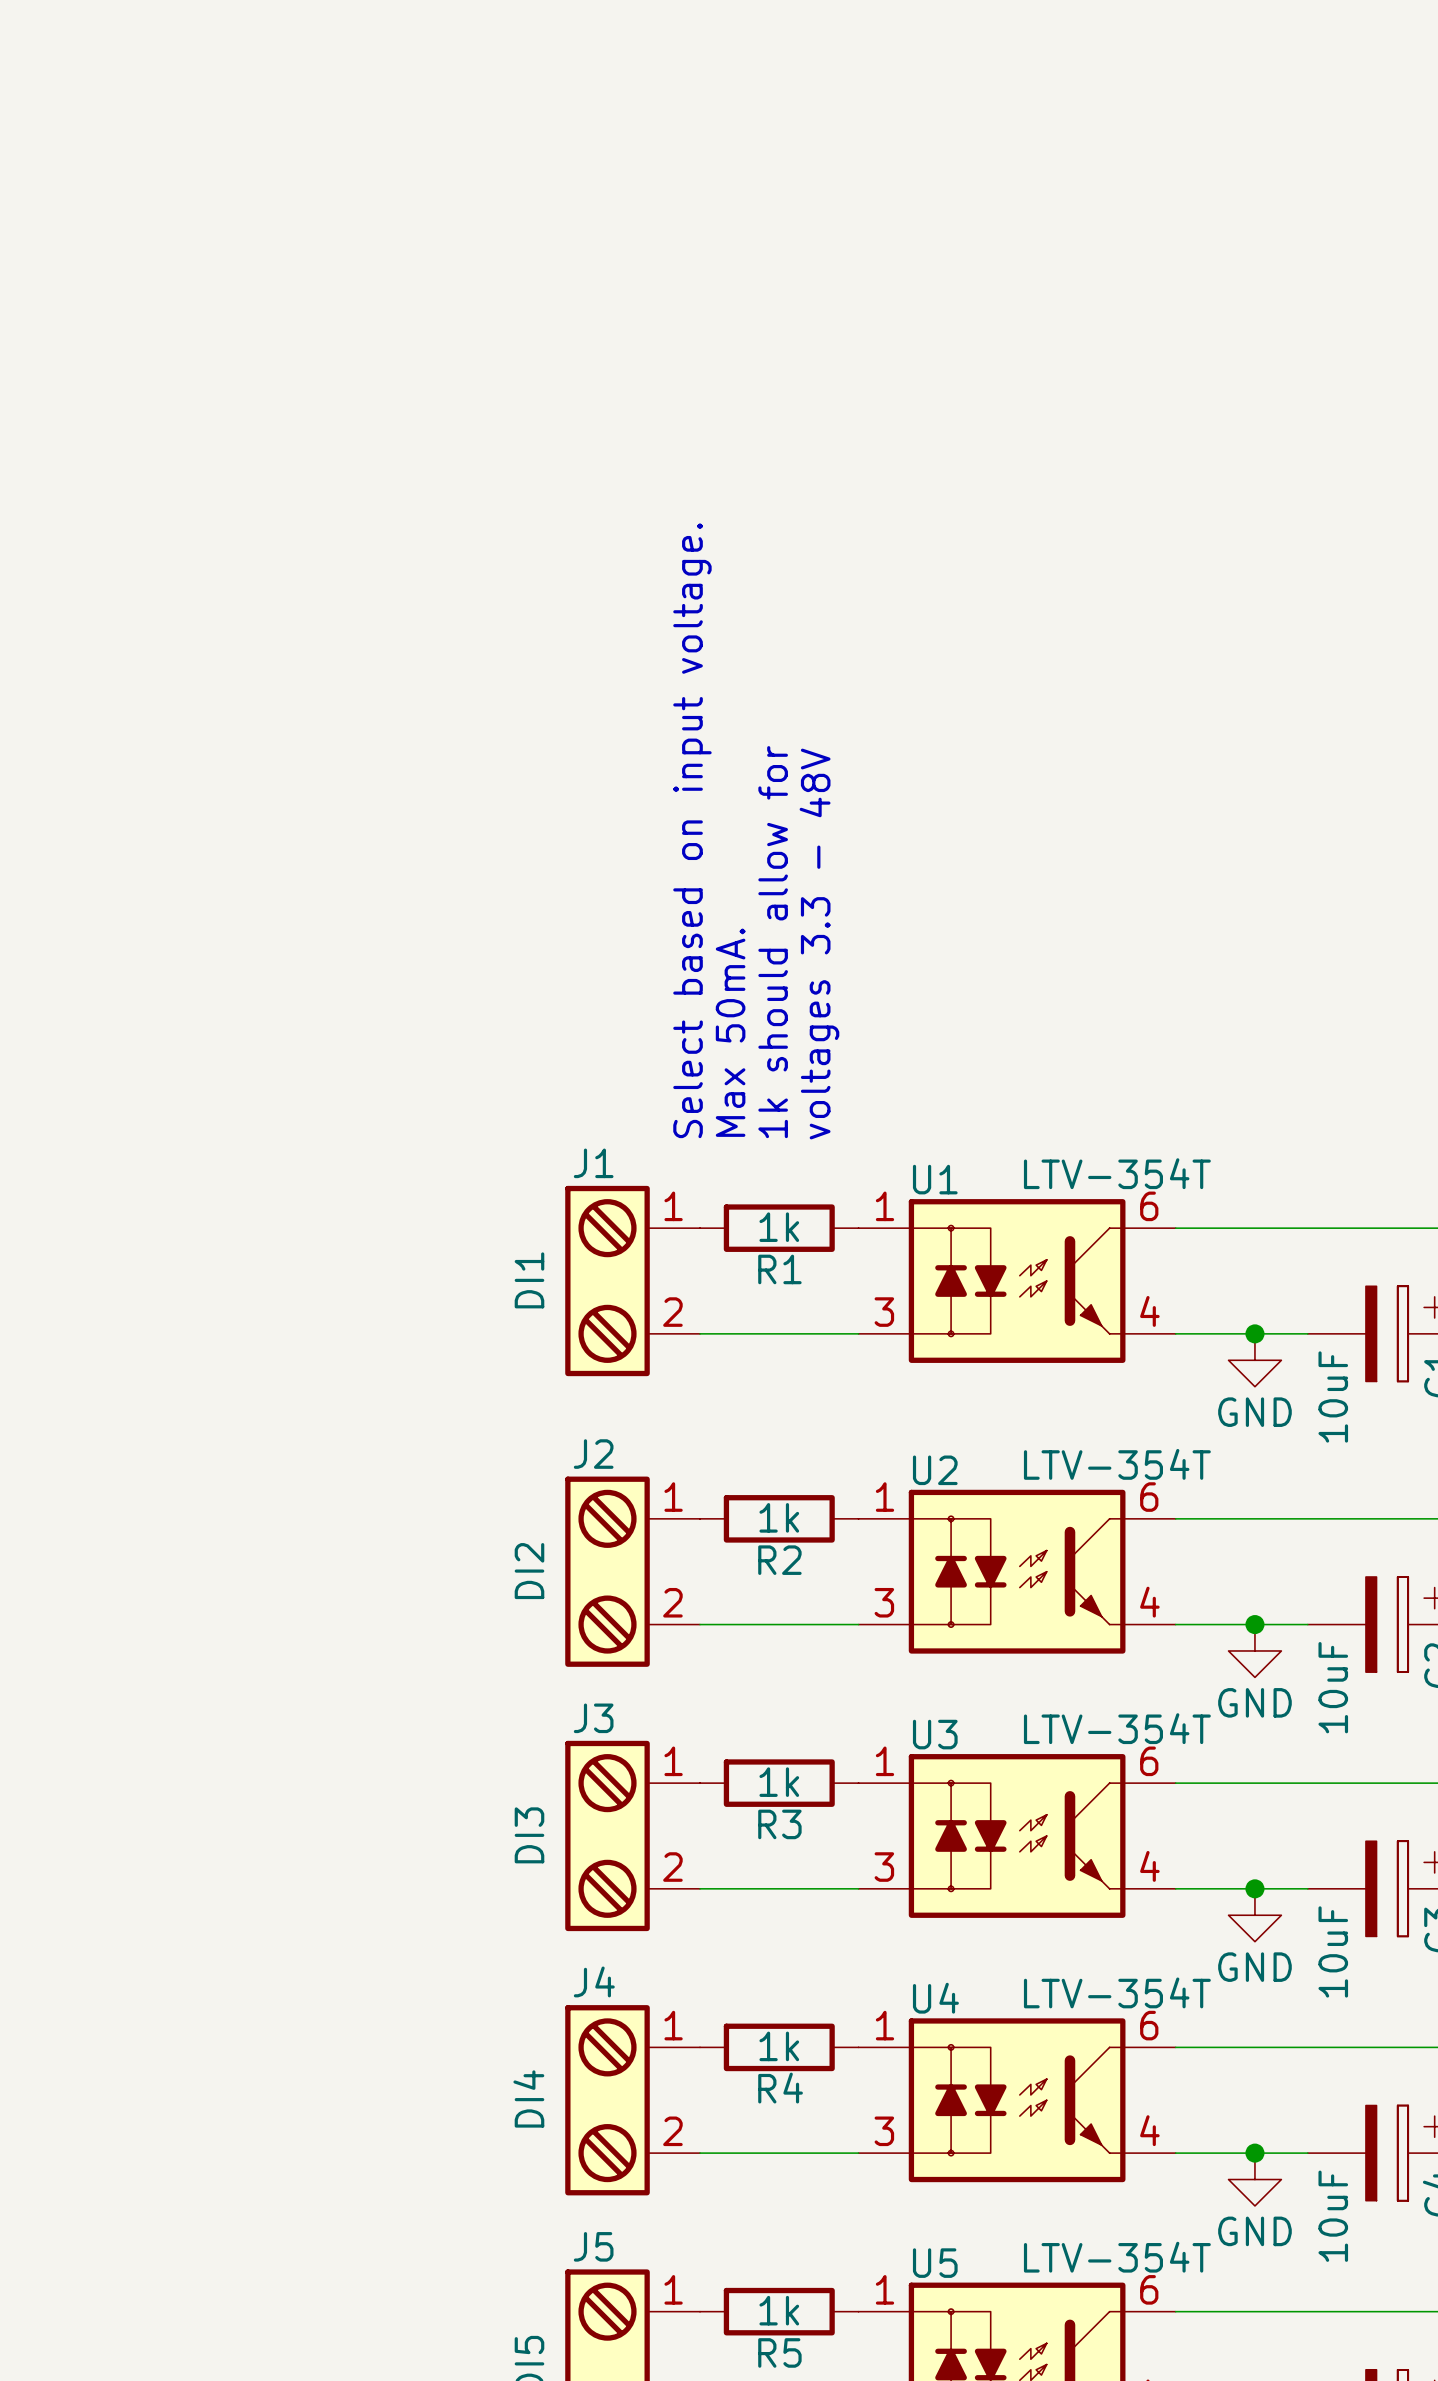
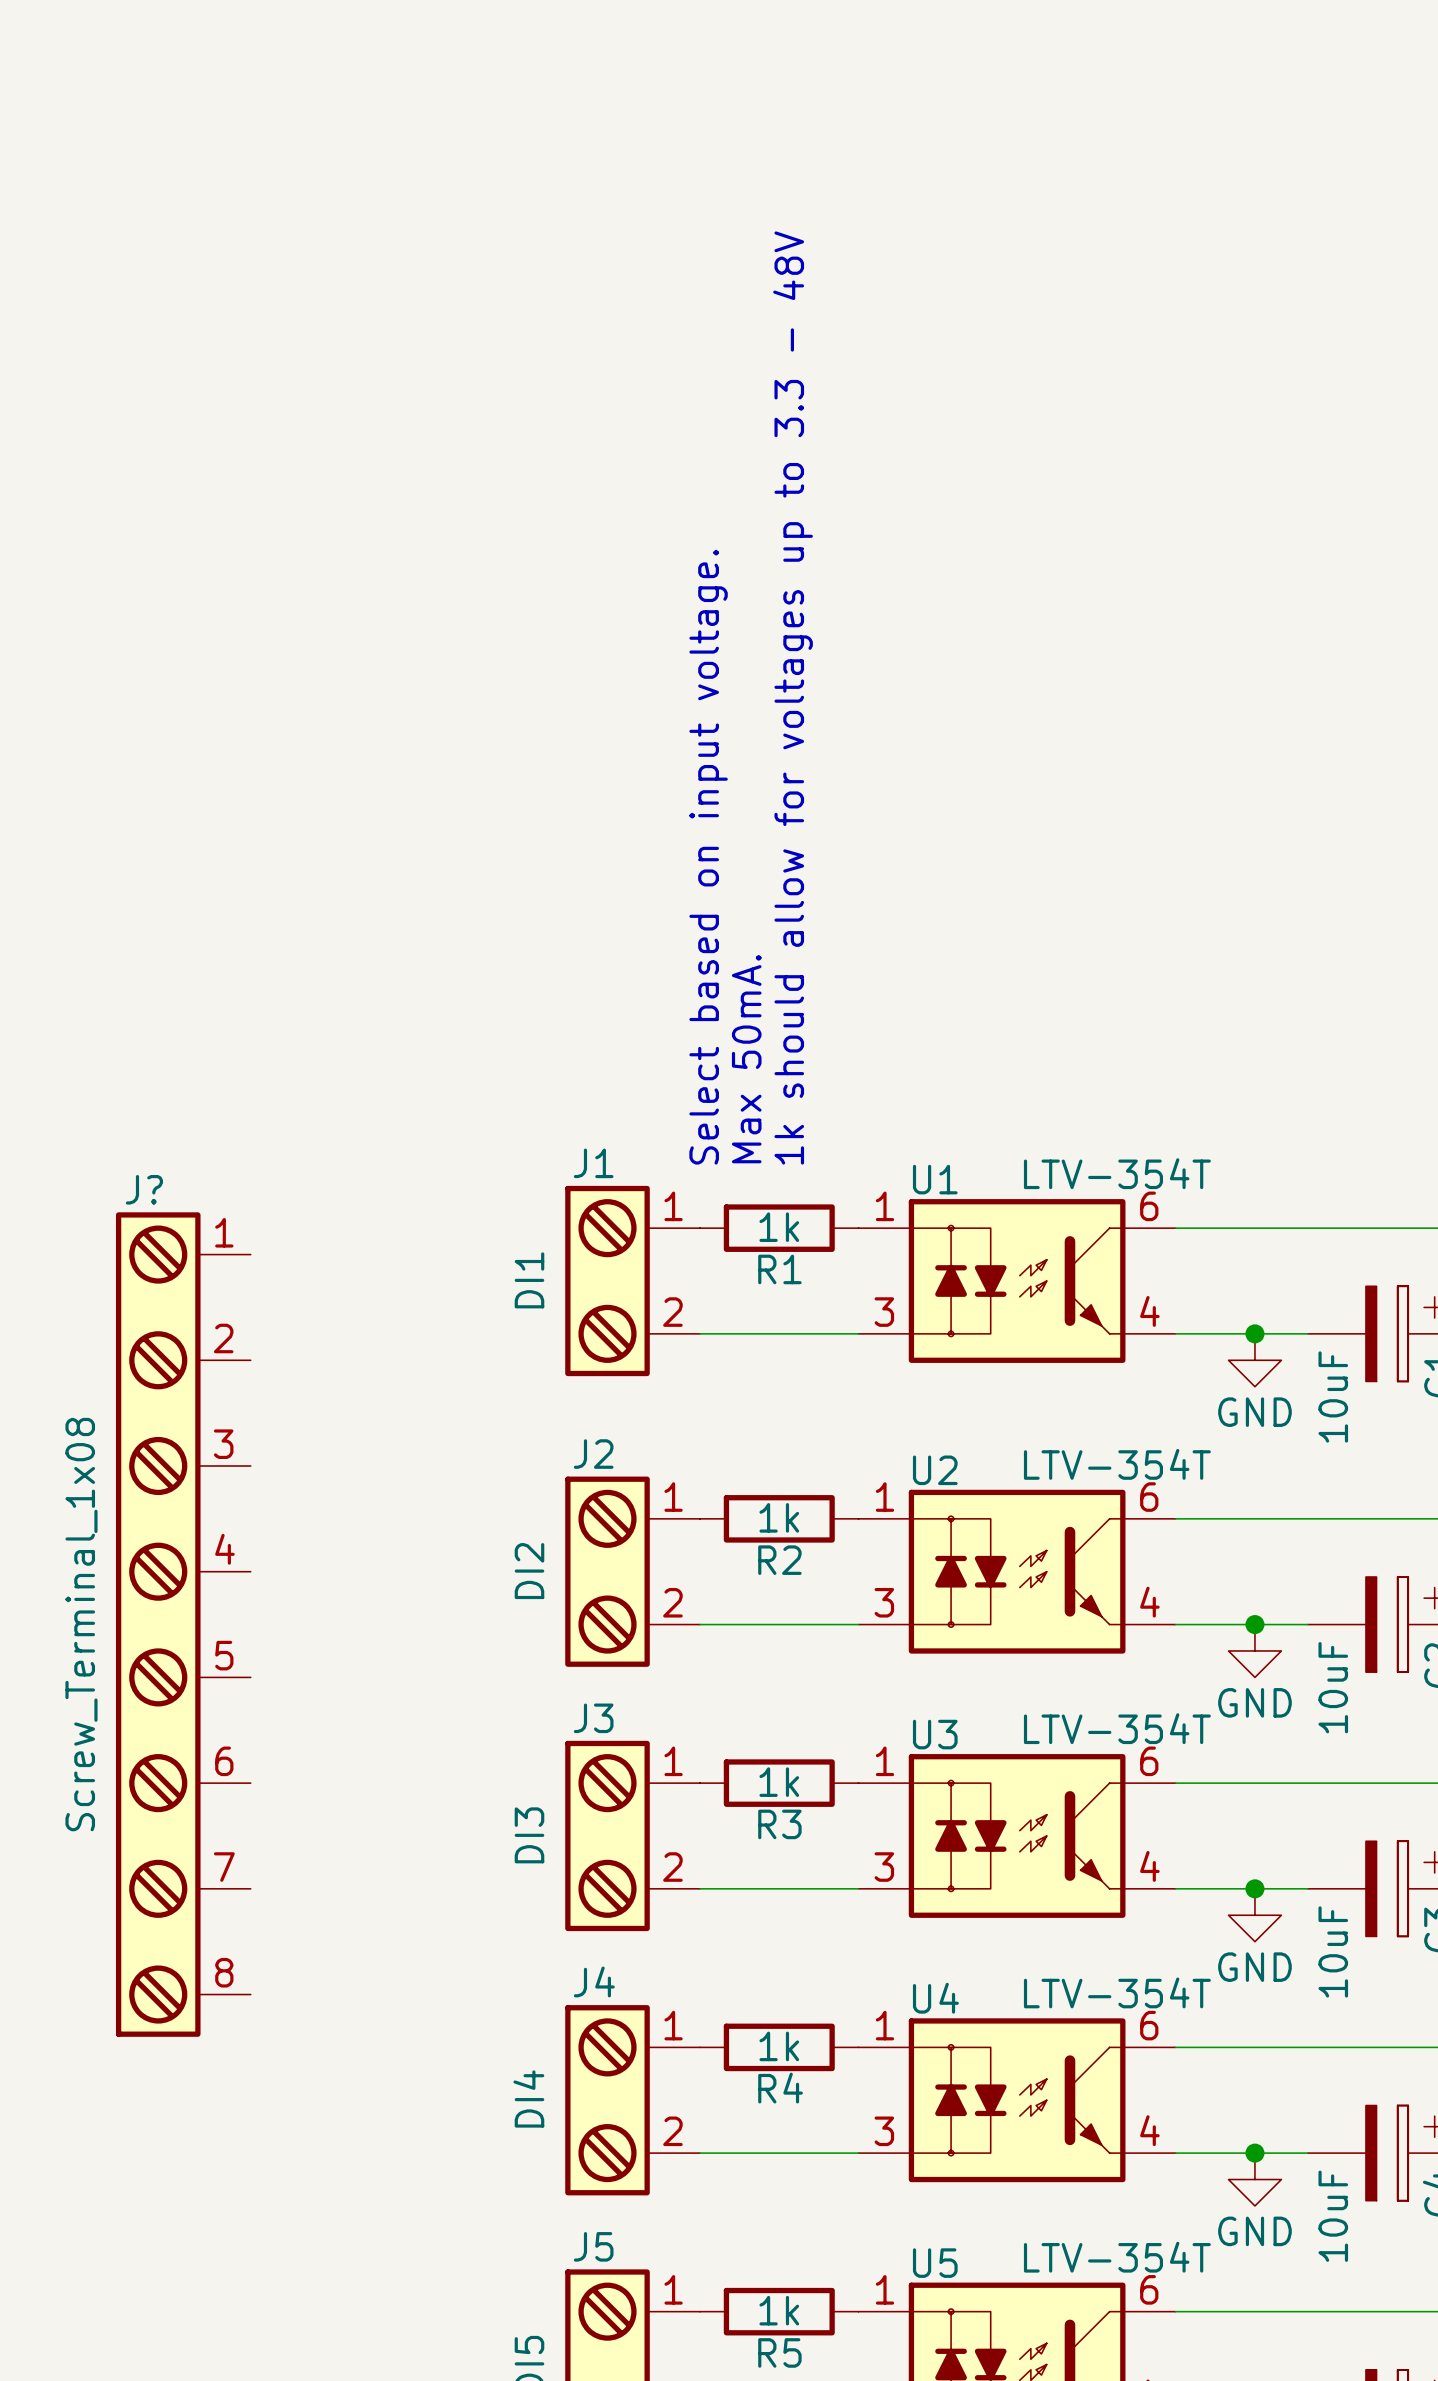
text position: Select based on input voltage. (692, 830) -> Select based on input voltage. (708, 857)
text: 1k should allow for (773, 942) -> 1k should allow for voltages up to 3.3 - 48V (793, 697)
text: voltages 3.3 - 48V (819, 944) -> none
text position: Max 50mA. (730, 1032) -> Max 50mA. (746, 1059)
J?: none -> Screw_Terminal_1x08 (183, 1624)

